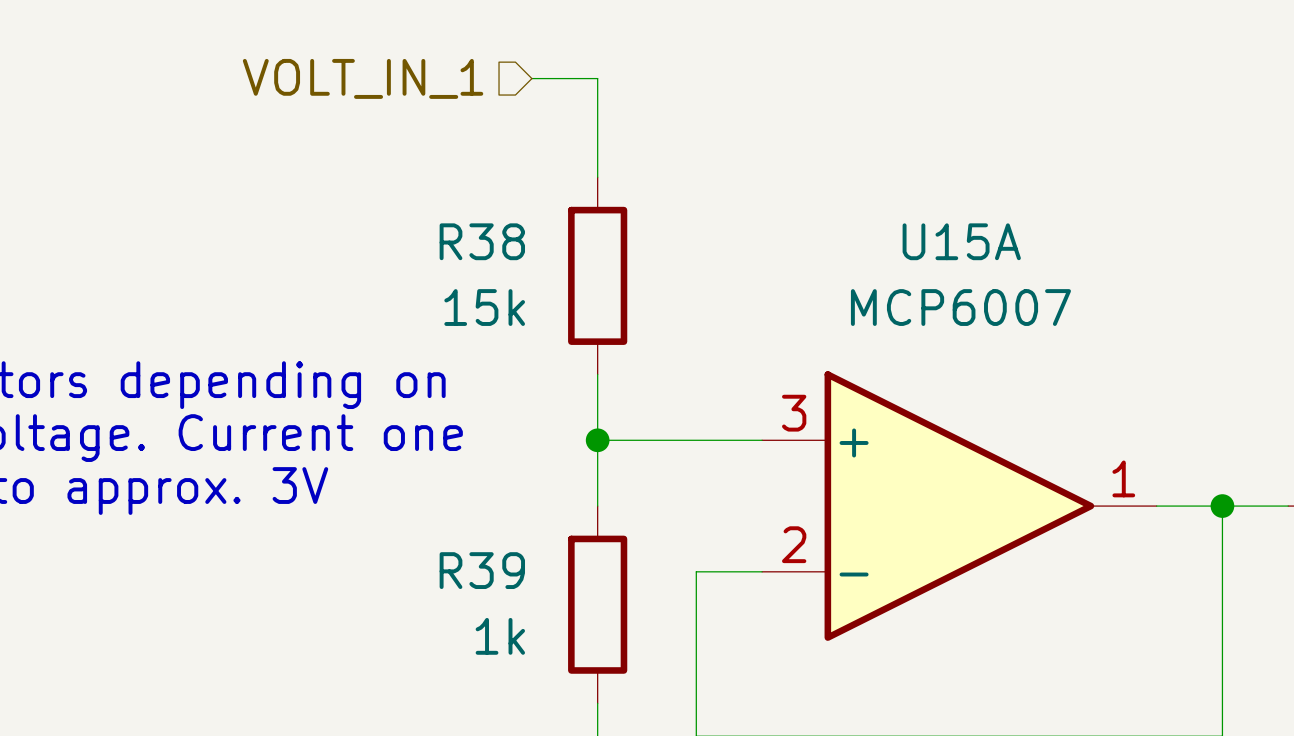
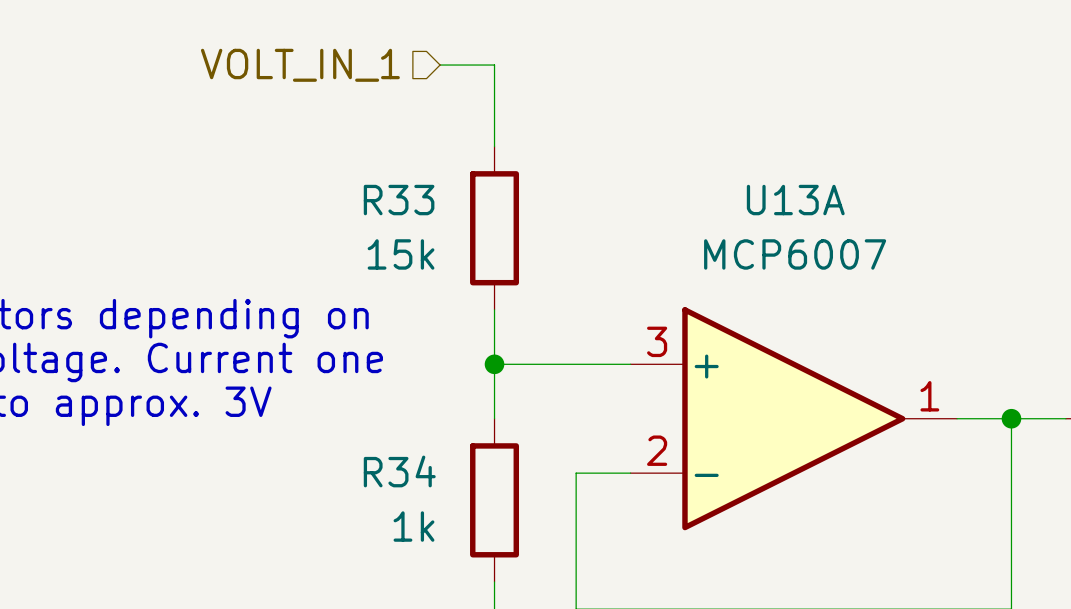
R38 name: R38 (482, 241) -> R33 (399, 200)
U15A name: U15A (961, 241) -> U13A (795, 200)
R39 name: R39 (482, 570) -> R34 (399, 471)

